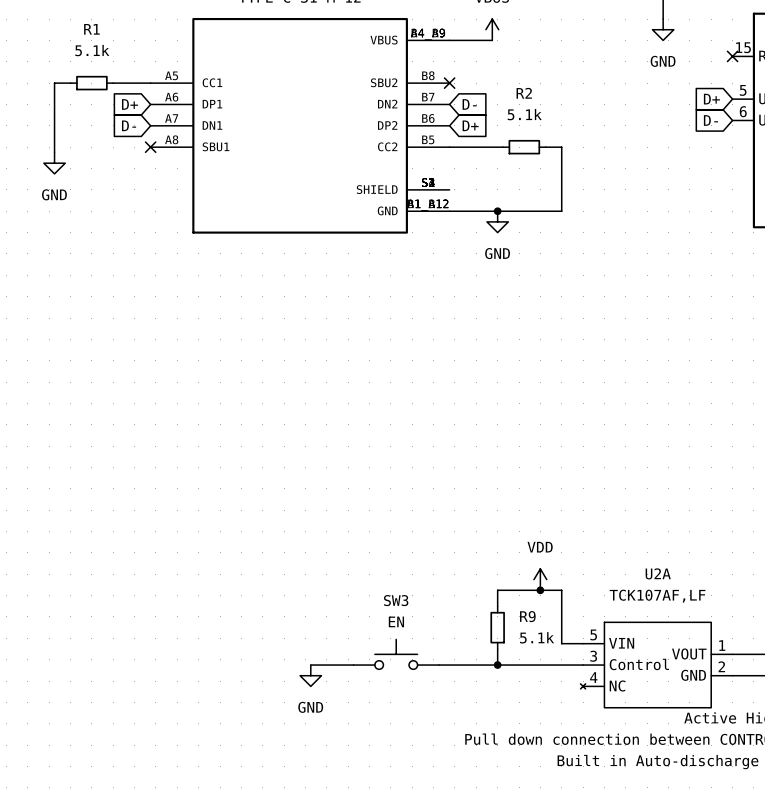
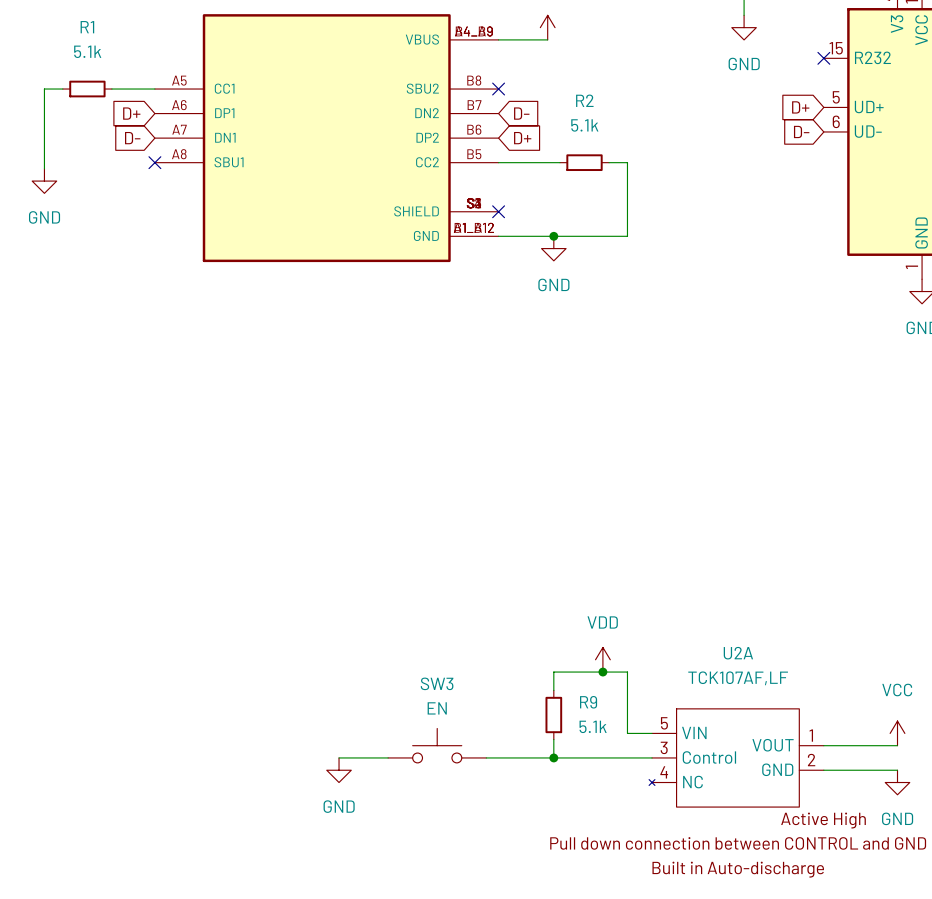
no-connect mark: none -> (498, 211)

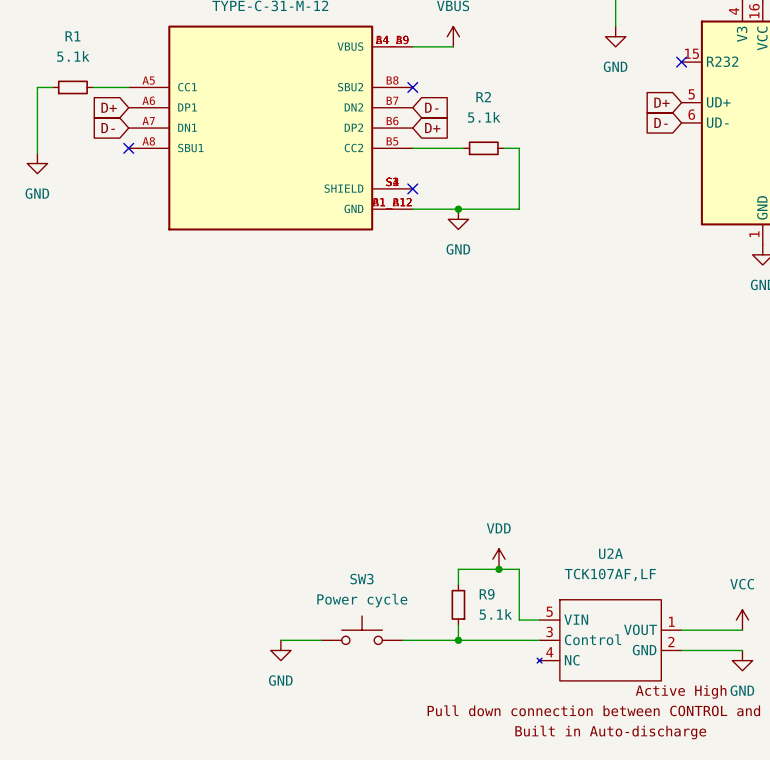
SW3 value: EN (437, 708) -> Power cycle (362, 600)

